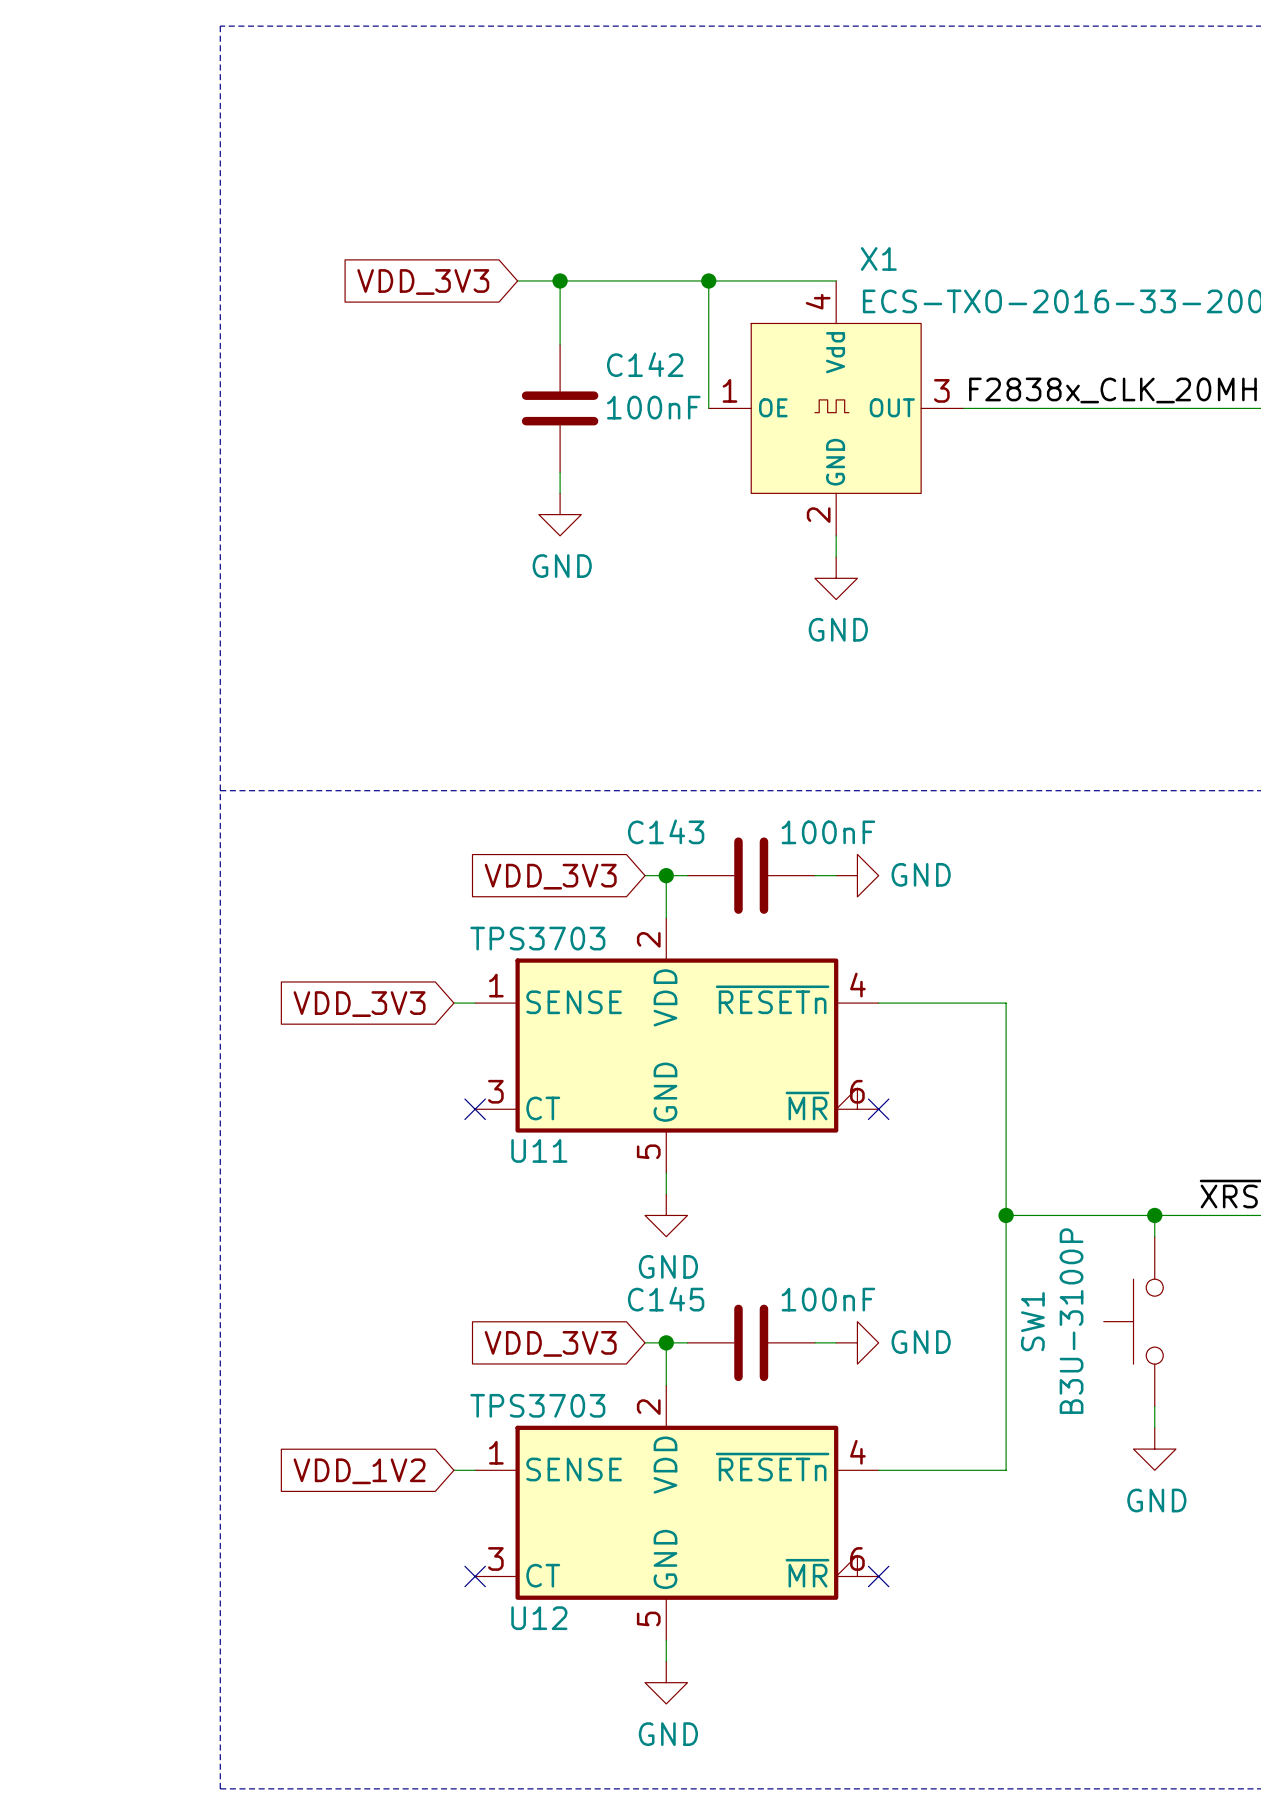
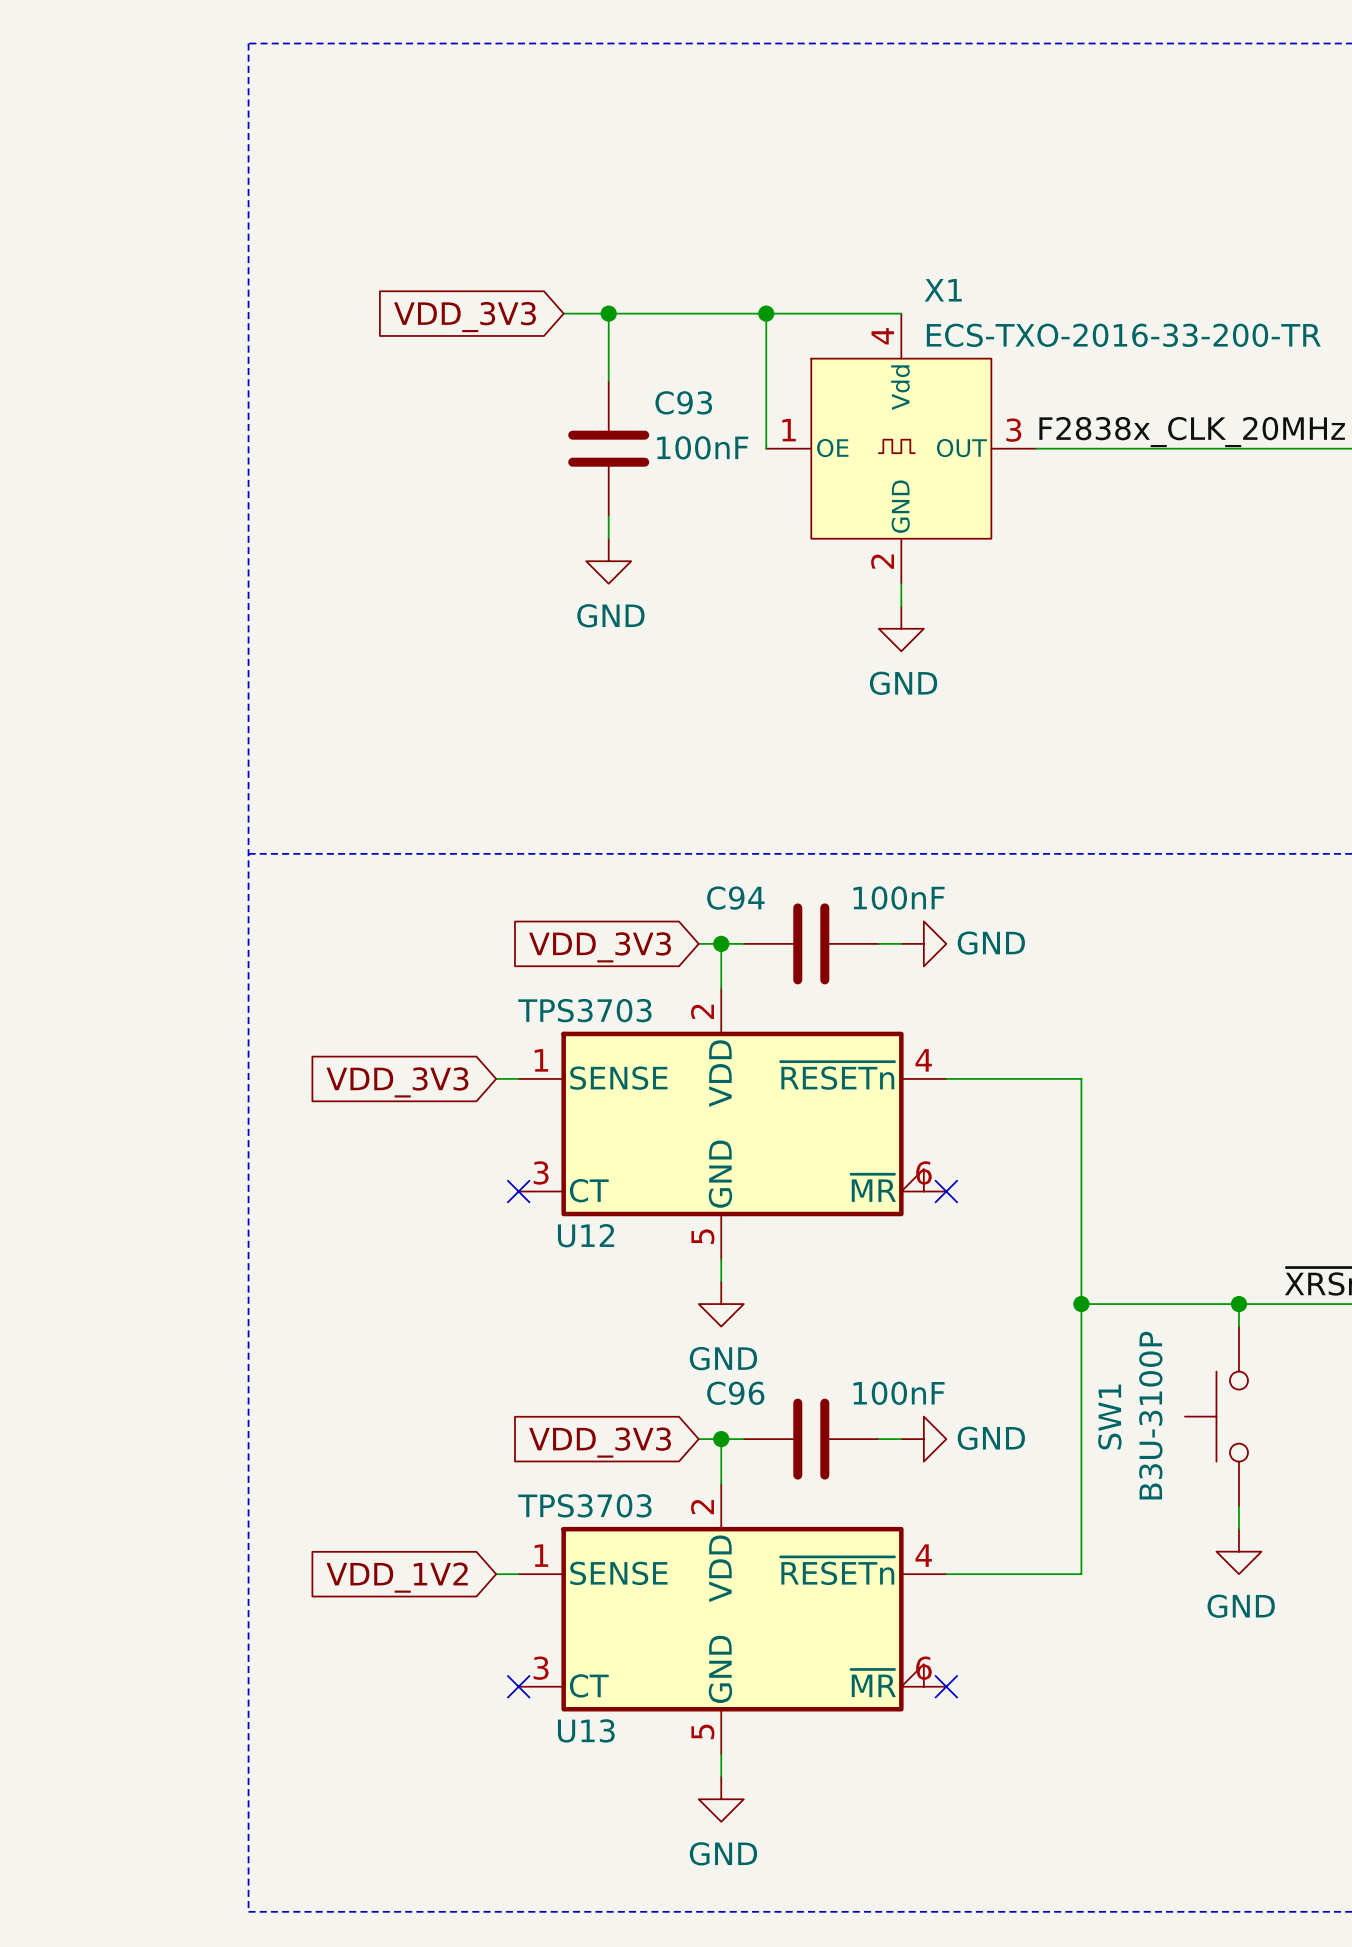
C142 name: C142 (645, 364) -> C93 (683, 402)
C143 name: C143 (666, 831) -> C94 (735, 898)
U11 name: U11 (539, 1150) -> U12 (585, 1235)
C145 name: C145 (666, 1299) -> C96 (735, 1393)
U12 name: U12 (539, 1618) -> U13 (586, 1730)

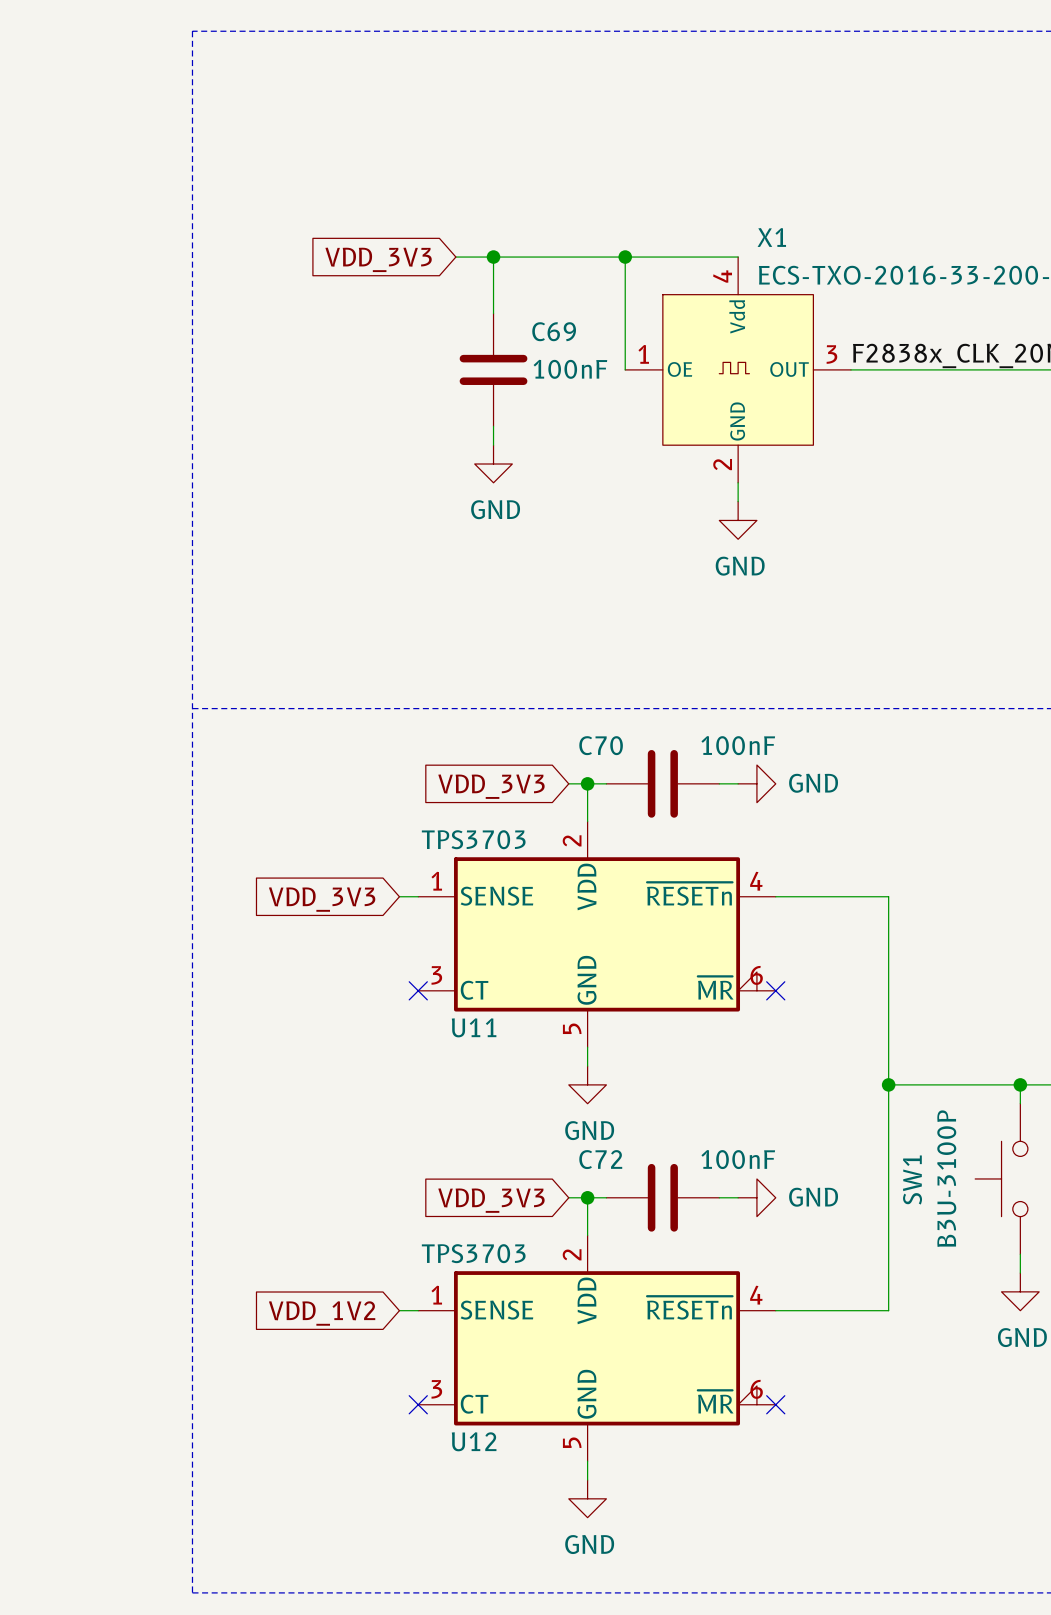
C93 name: C93 (683, 402) -> C69 (554, 331)
C94 name: C94 (735, 898) -> C70 (601, 745)
U12 name: U12 (585, 1235) -> U11 (474, 1027)
C96 name: C96 (735, 1393) -> C72 (600, 1159)
U13 name: U13 (586, 1730) -> U12 (474, 1441)

